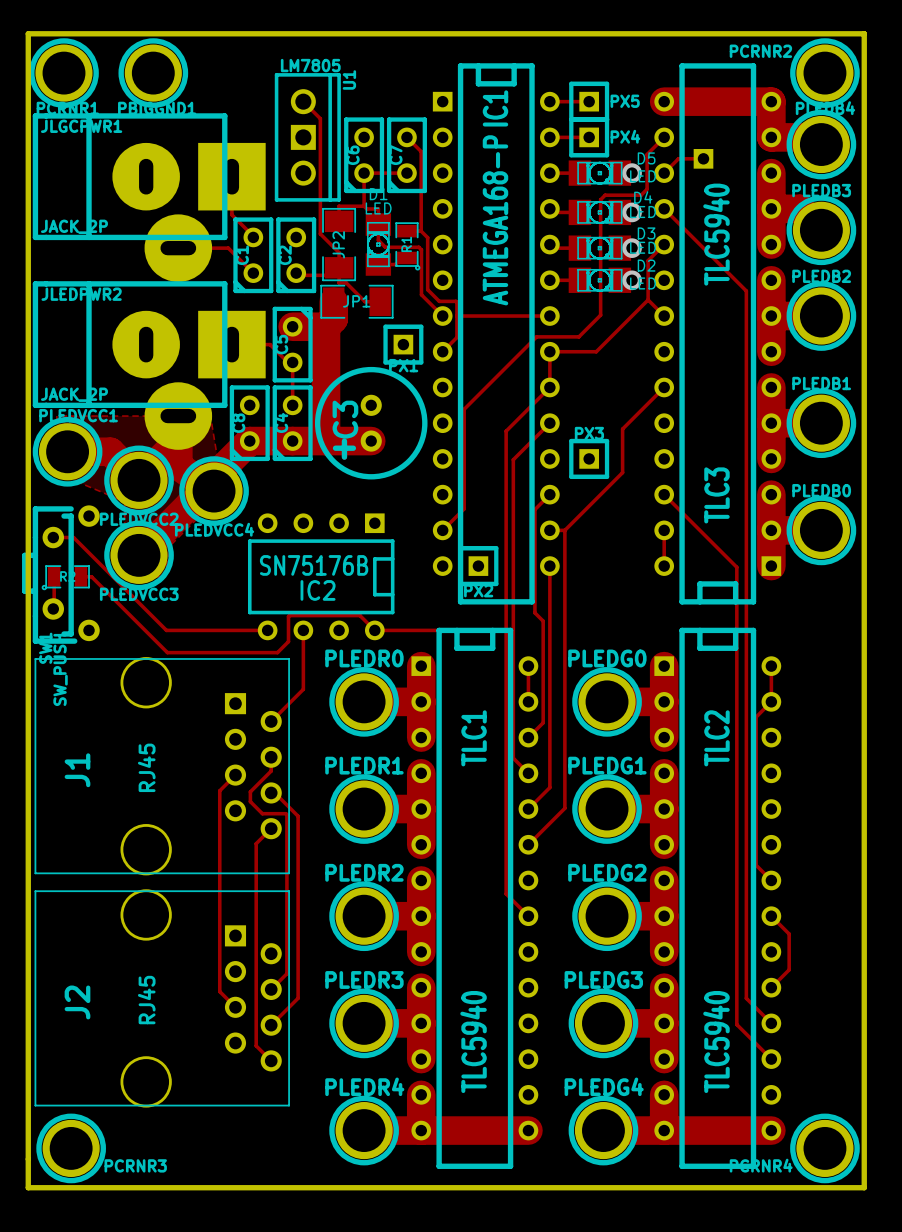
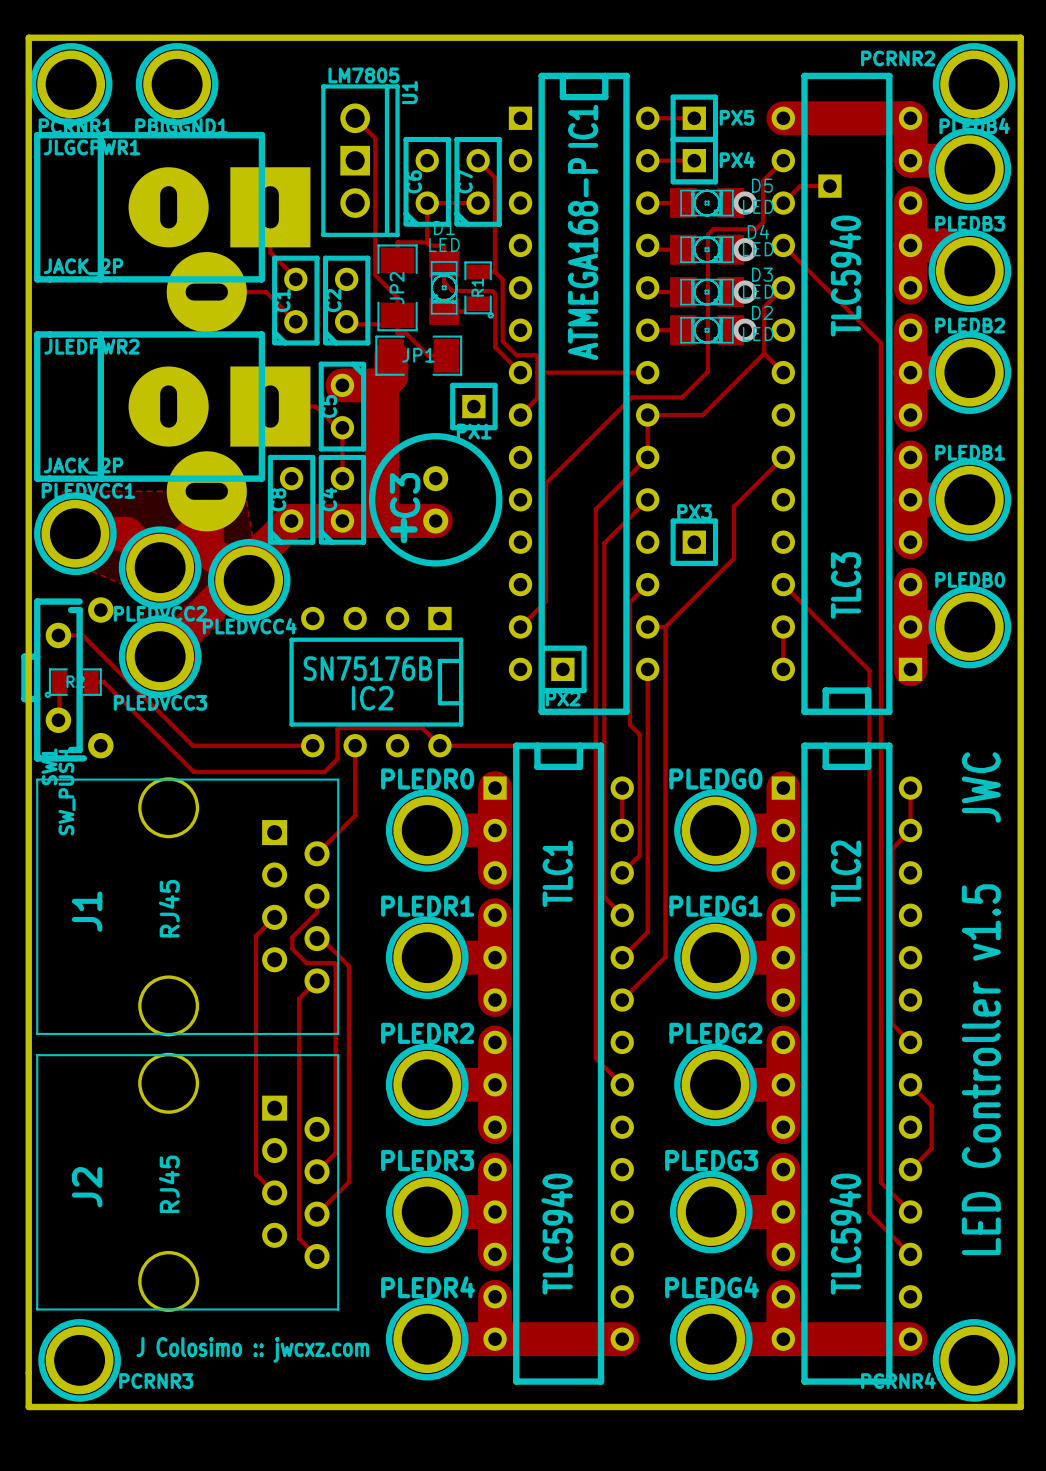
text: none -> LED Controller v1.5 JWC (981, 1003)
text: none -> J Colosimo :: jwcxz.com (252, 1349)

